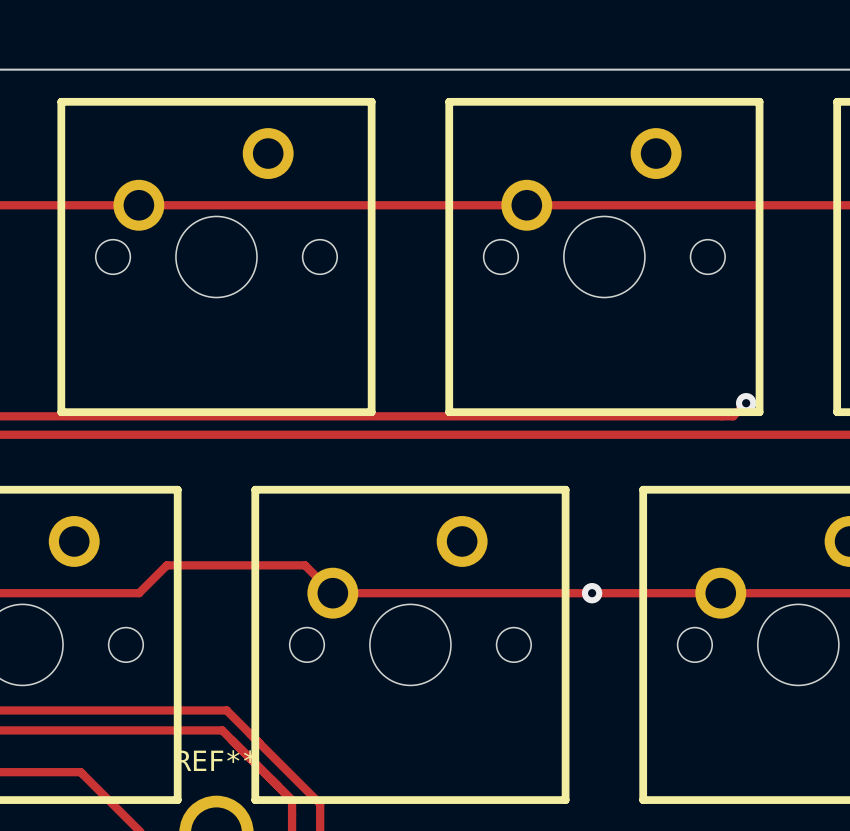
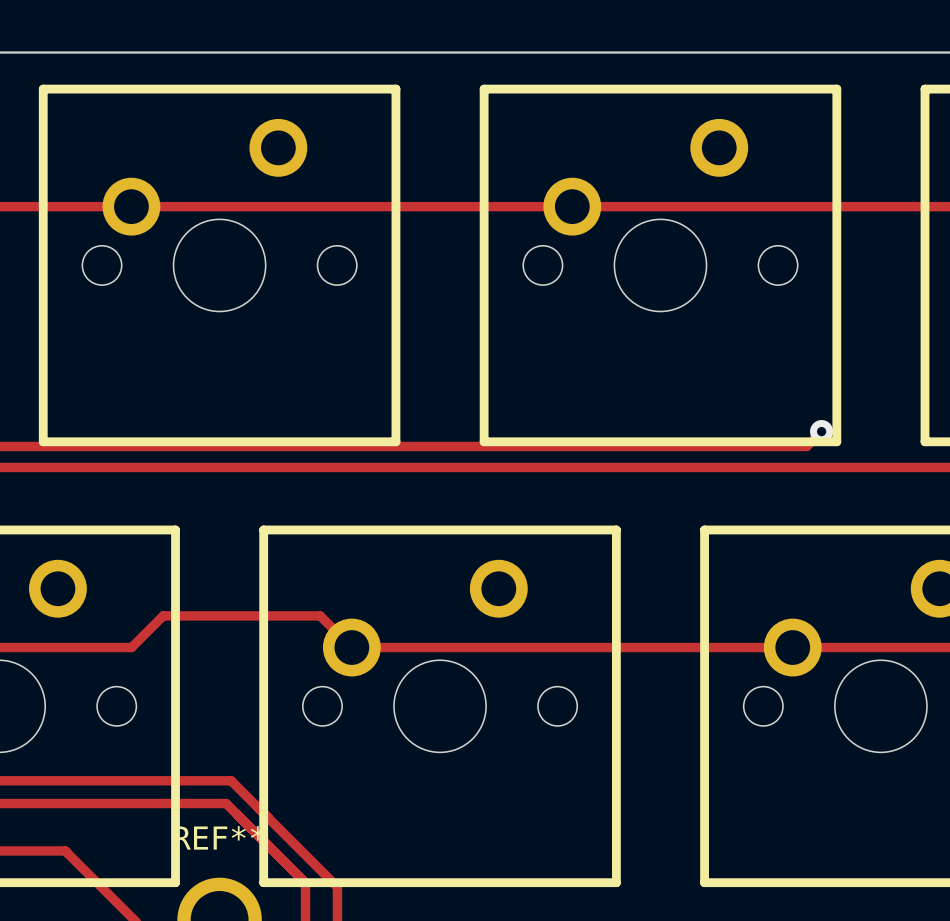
via: (592, 593) -> none

